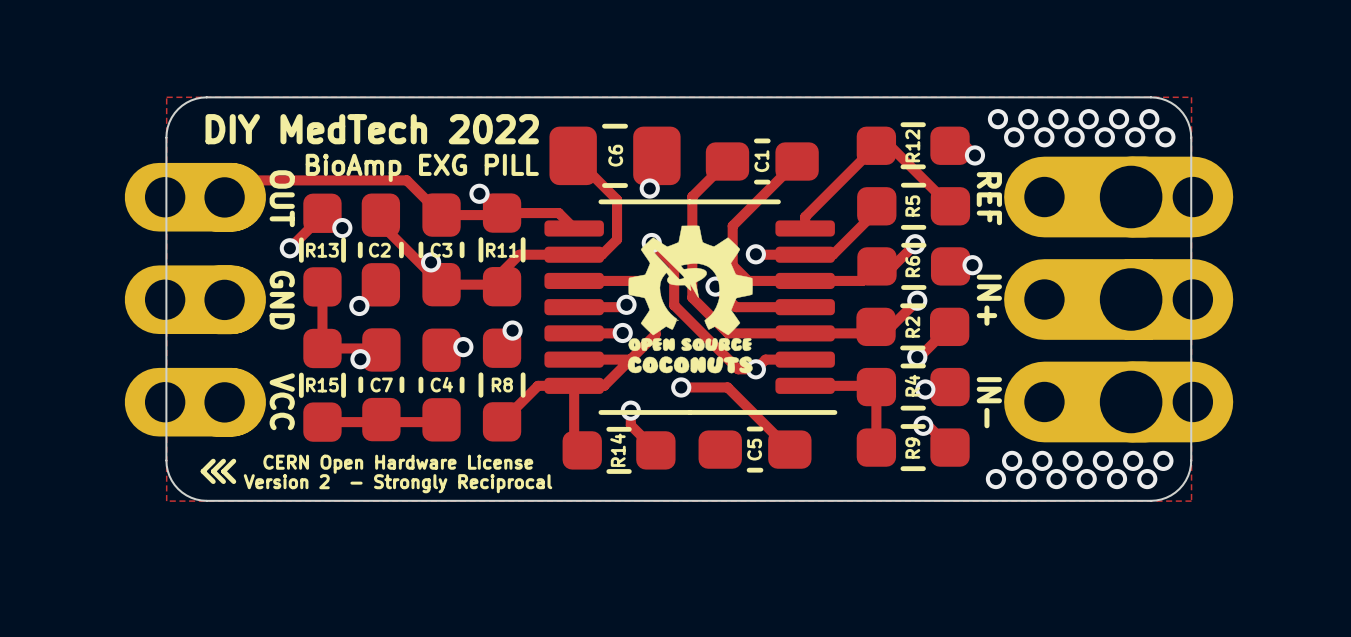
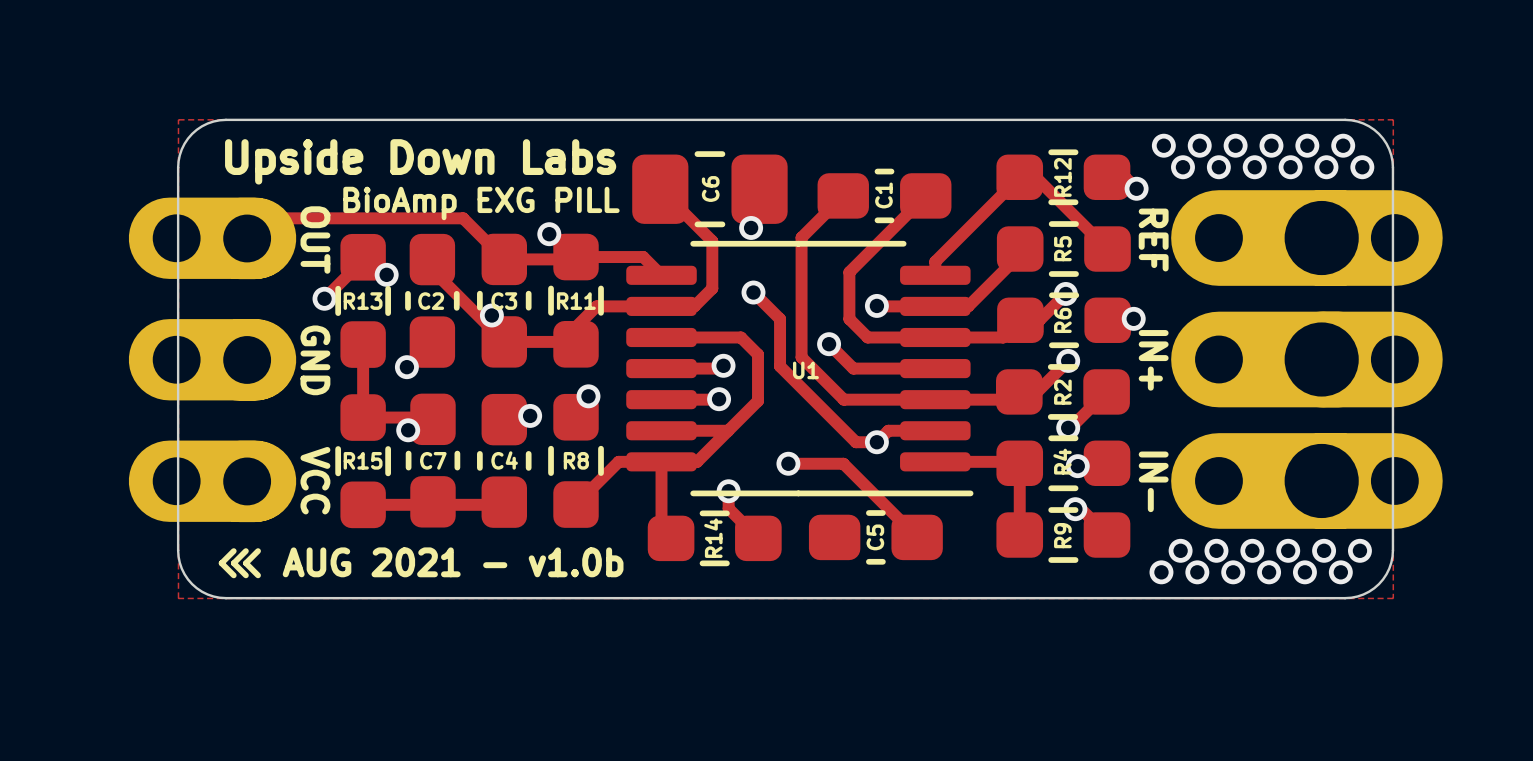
text: DIY MedTech 2022 (372, 129) -> Upside Down Labs (420, 161)
drawing: [627, 225, 753, 374] -> none
U1 name: none -> U1 (805, 370)
text: CERN Open Hardware License (398, 464) -> none
text: none -> AUG 2021 - v1.0b (453, 562)
text: Version 2 - Strongly Reciprocal (398, 483) -> none

